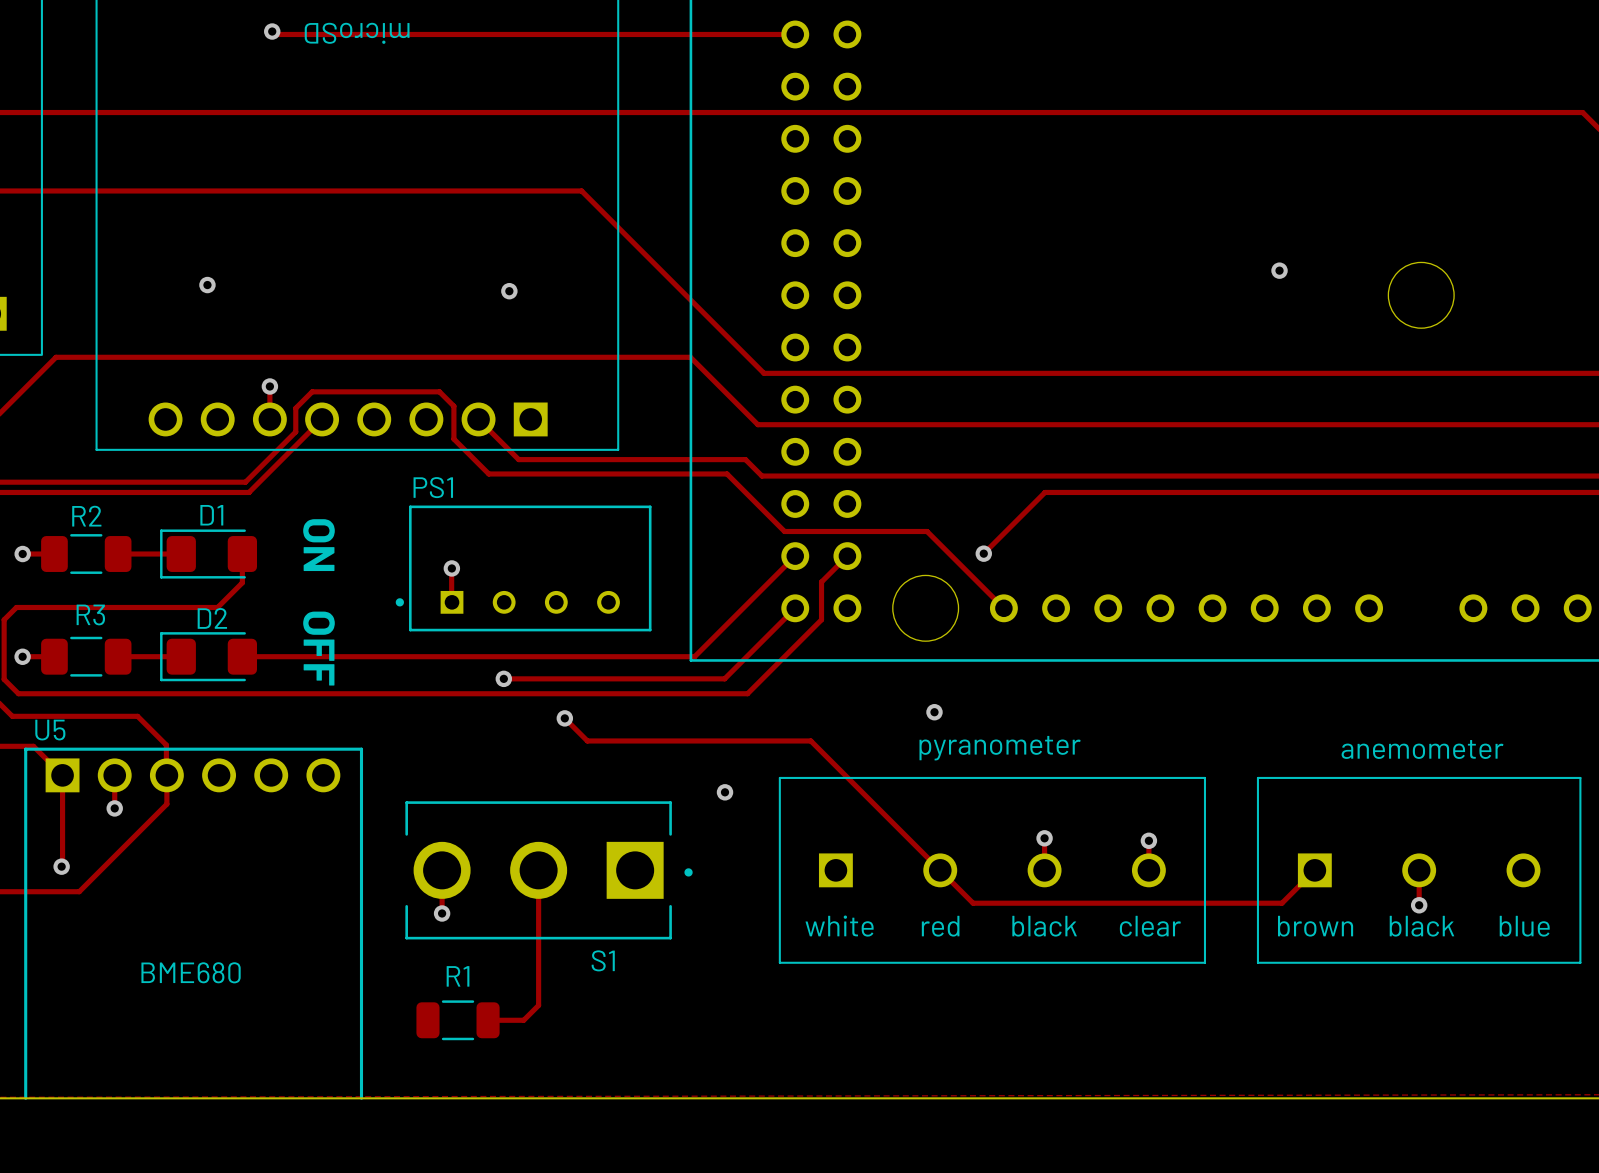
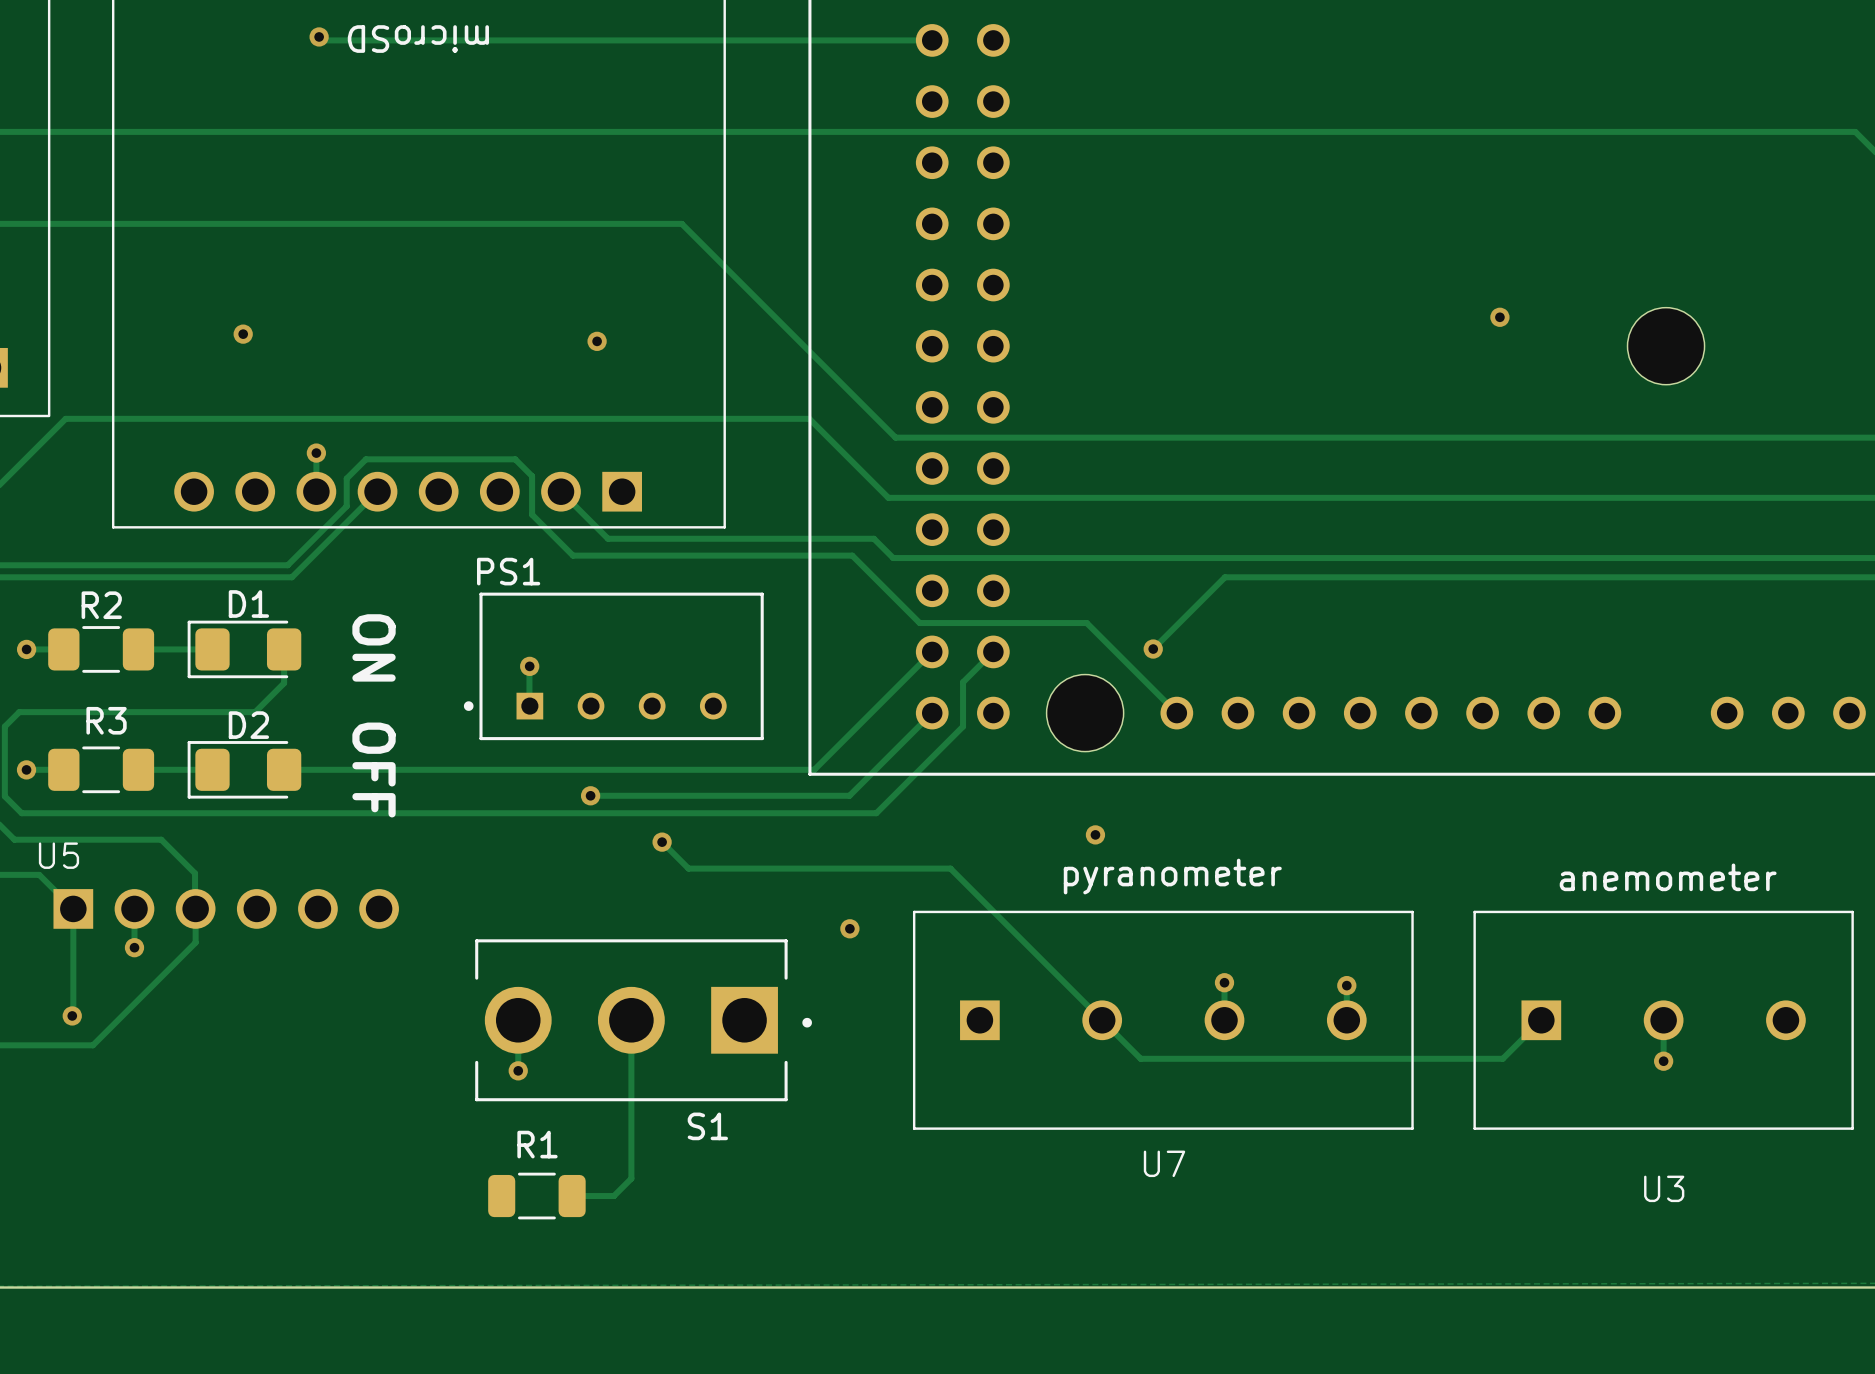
text: white (839, 926) -> none
text: red (940, 926) -> none
text: black (1044, 926) -> none
text: clear (1150, 926) -> none
text: brown (1315, 926) -> none
text: black (1421, 926) -> none
text: blue (1524, 926) -> none
U5 value: BME680 (191, 972) -> none
U7 name: none -> U7 (1164, 1163)
U3 name: none -> U3 (1664, 1188)
line: (25, 1098) (25, 749) (361, 749) (361, 1098) -> none

